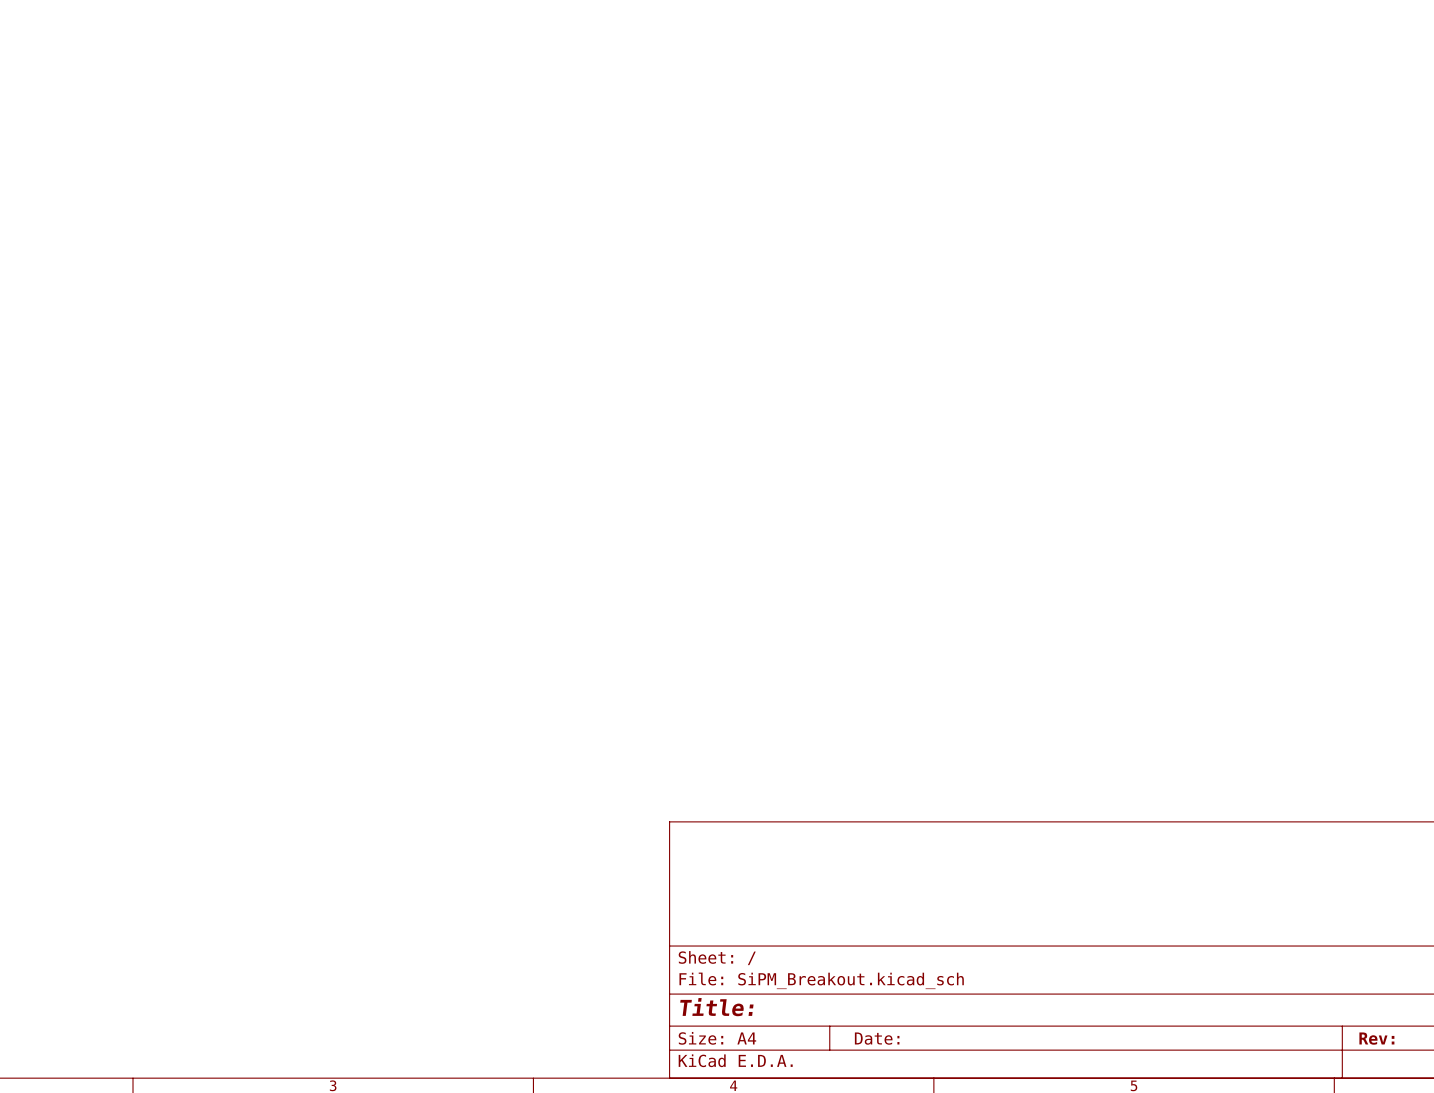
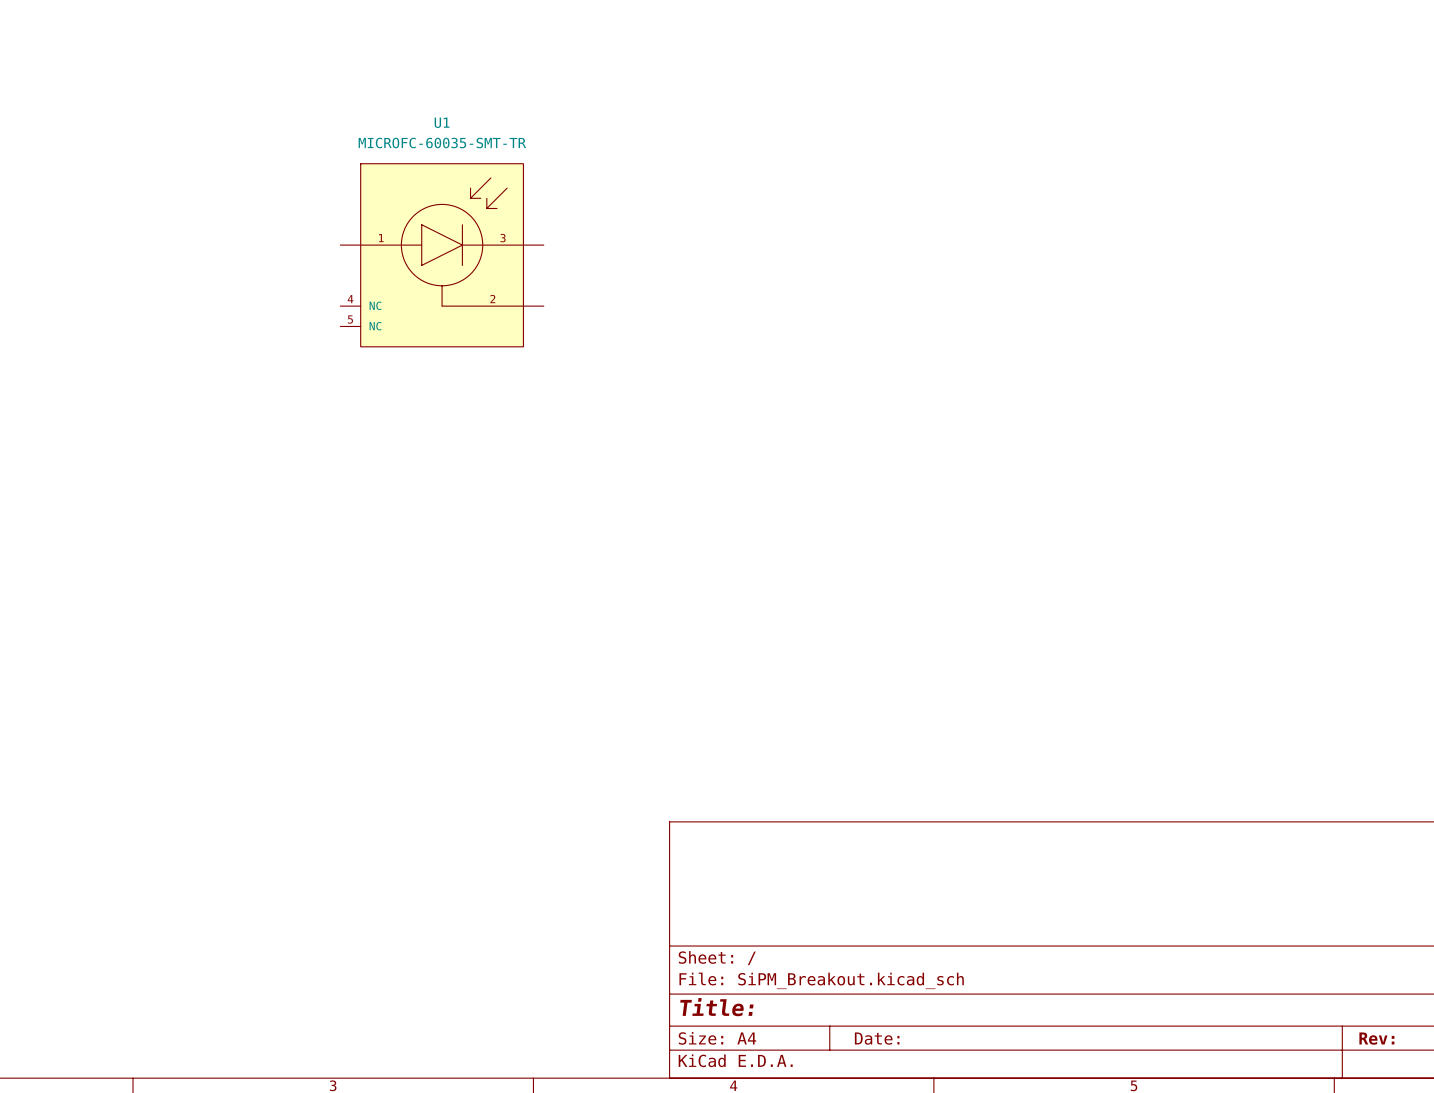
U1: none -> MICROFC-60035-SMT-TR (442, 255)

